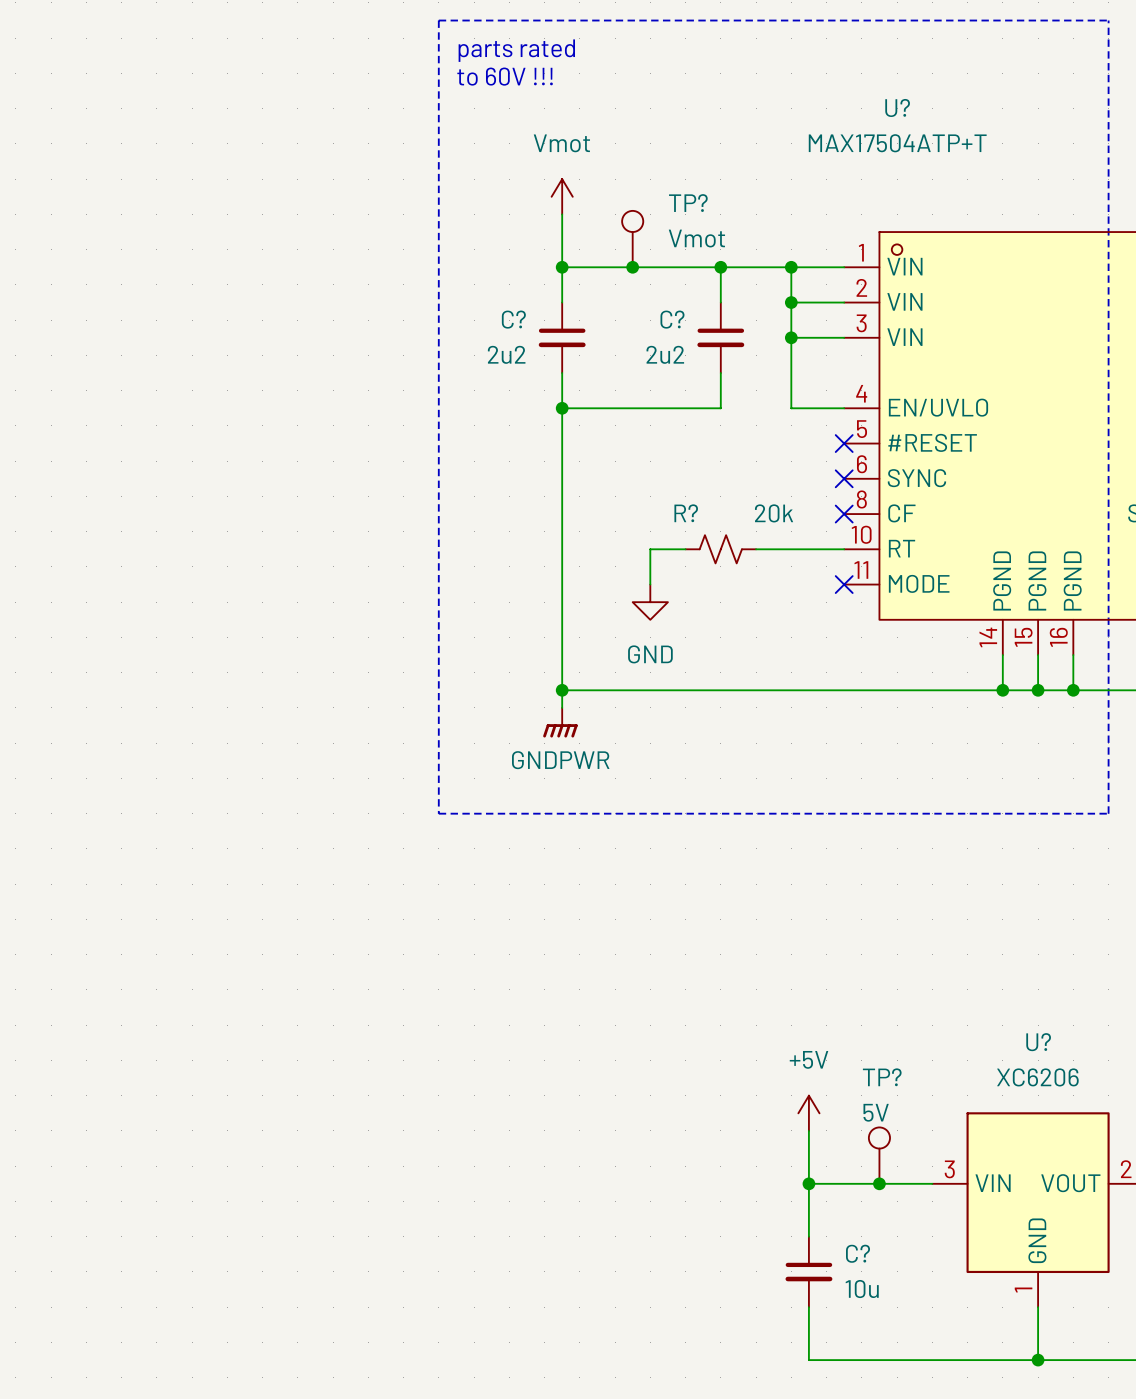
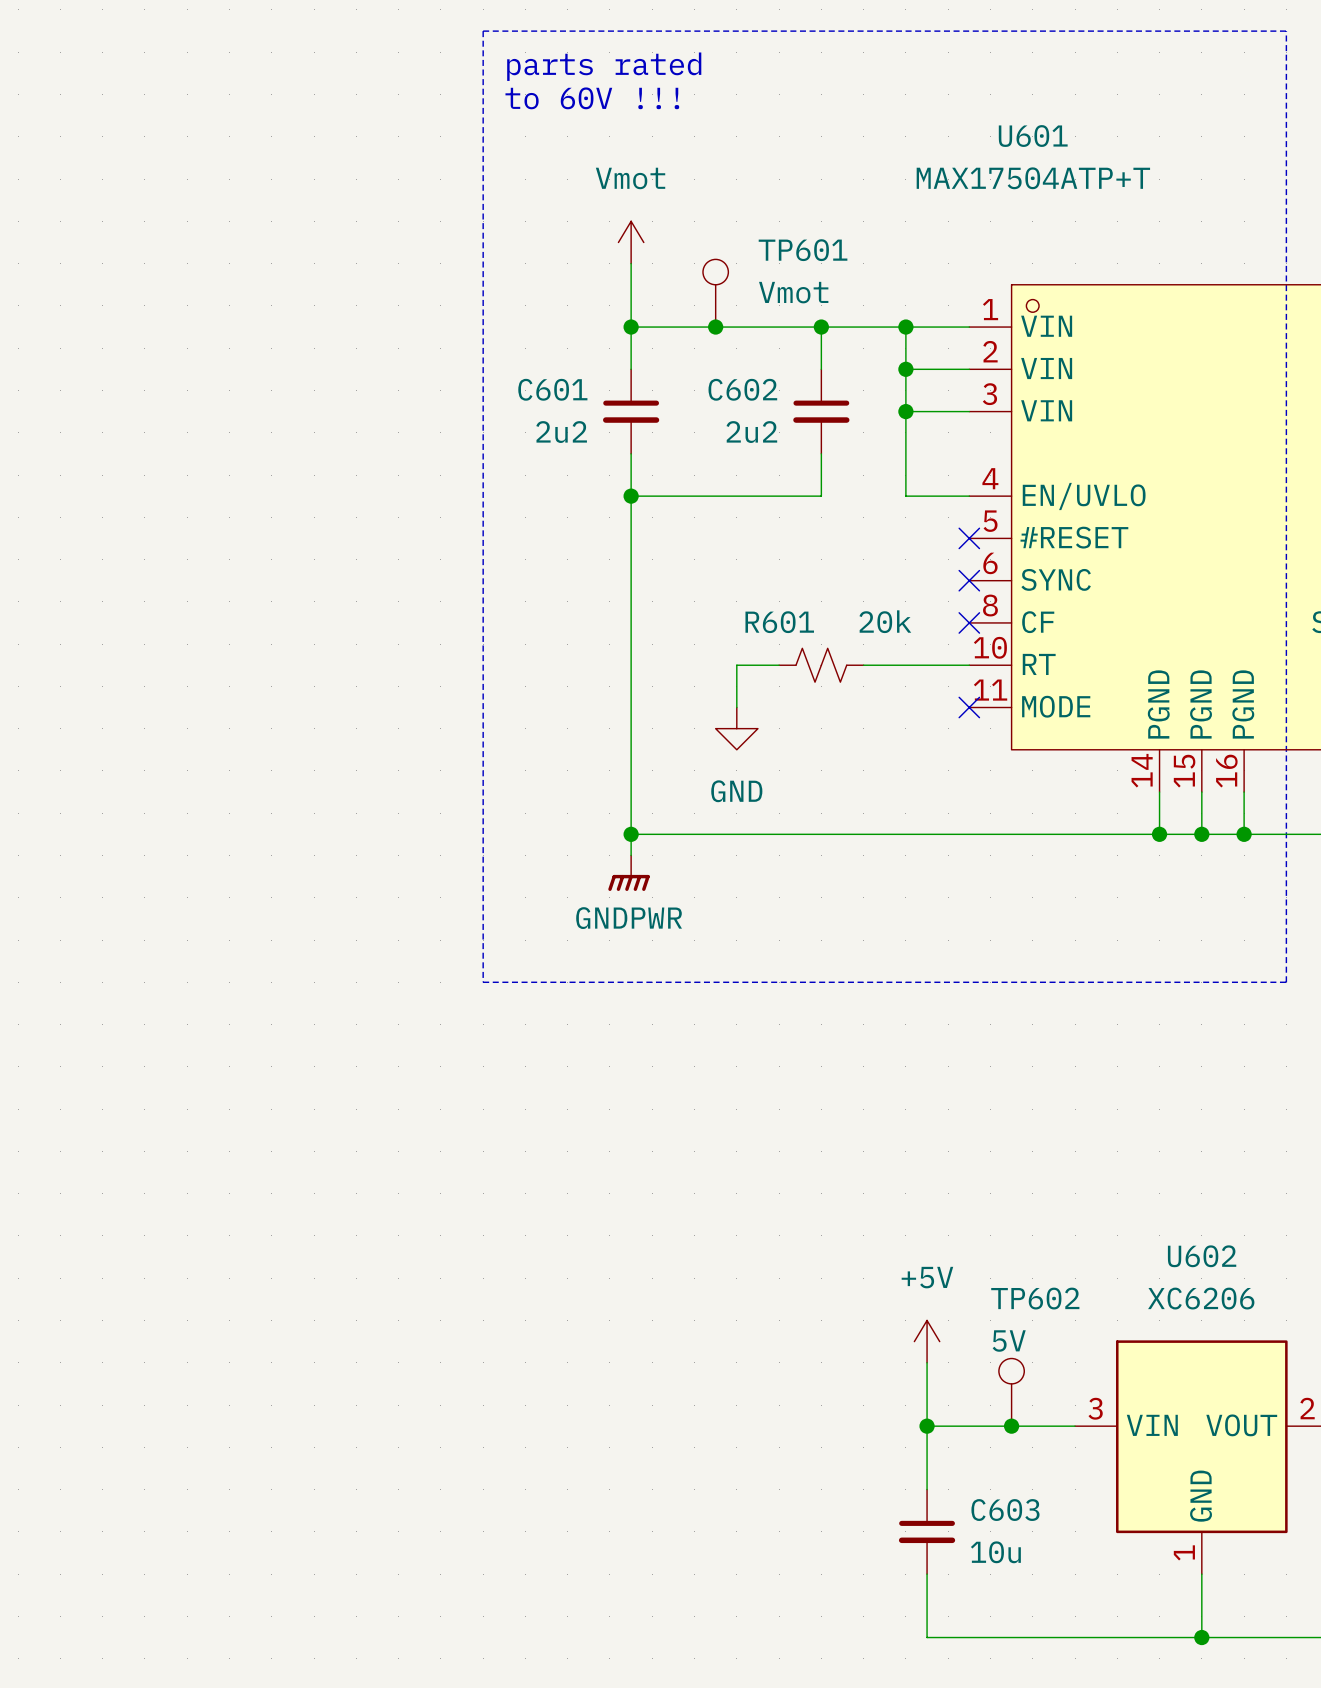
U? name: U? (897, 107) -> U601 (1033, 136)
TP? name: TP? (688, 203) -> TP601 (803, 250)
C? name: C? (513, 319) -> C601 (552, 389)
C? name: C? (672, 319) -> C602 (742, 389)
R? name: R? (686, 513) -> R601 (779, 622)
U? name: U? (1038, 1042) -> U602 (1202, 1256)
TP? name: TP? (882, 1077) -> TP602 (1035, 1298)
C? name: C? (858, 1253) -> C603 (1005, 1510)

